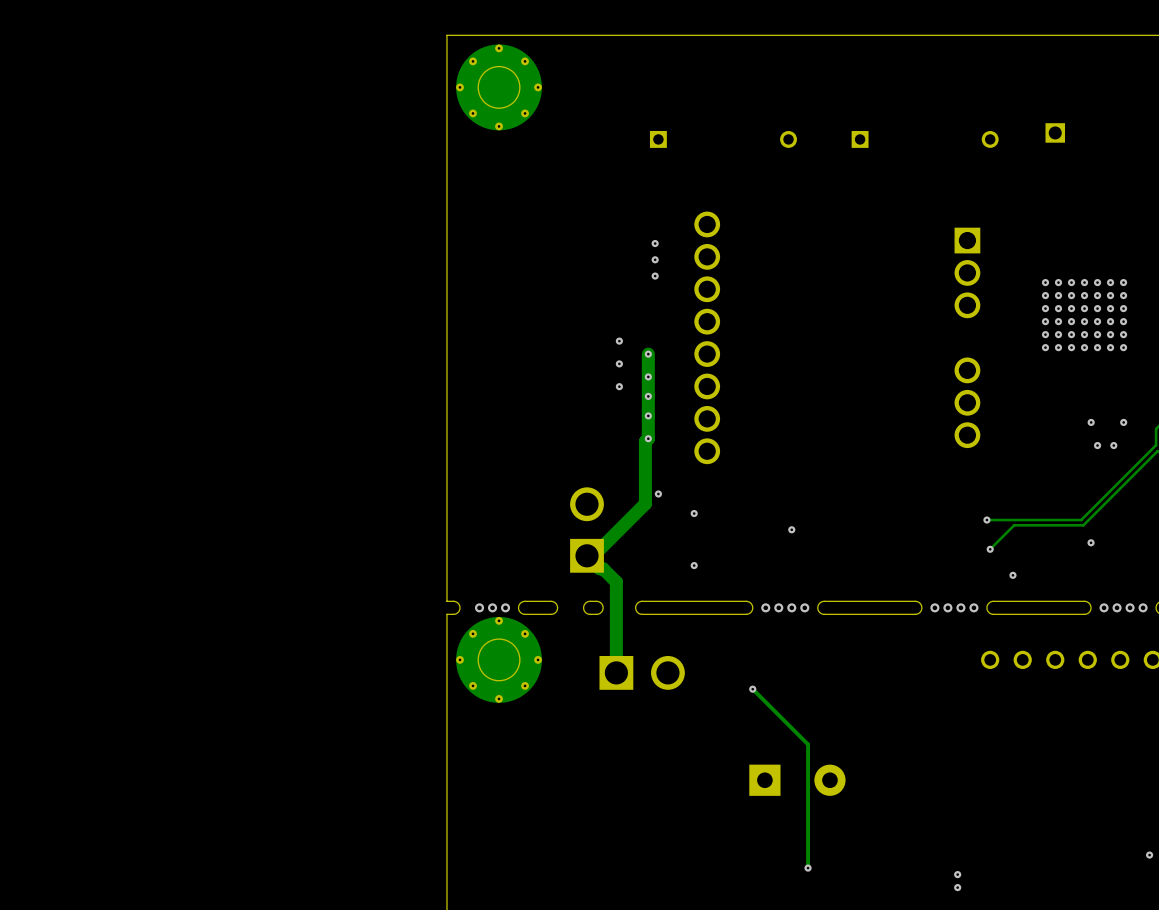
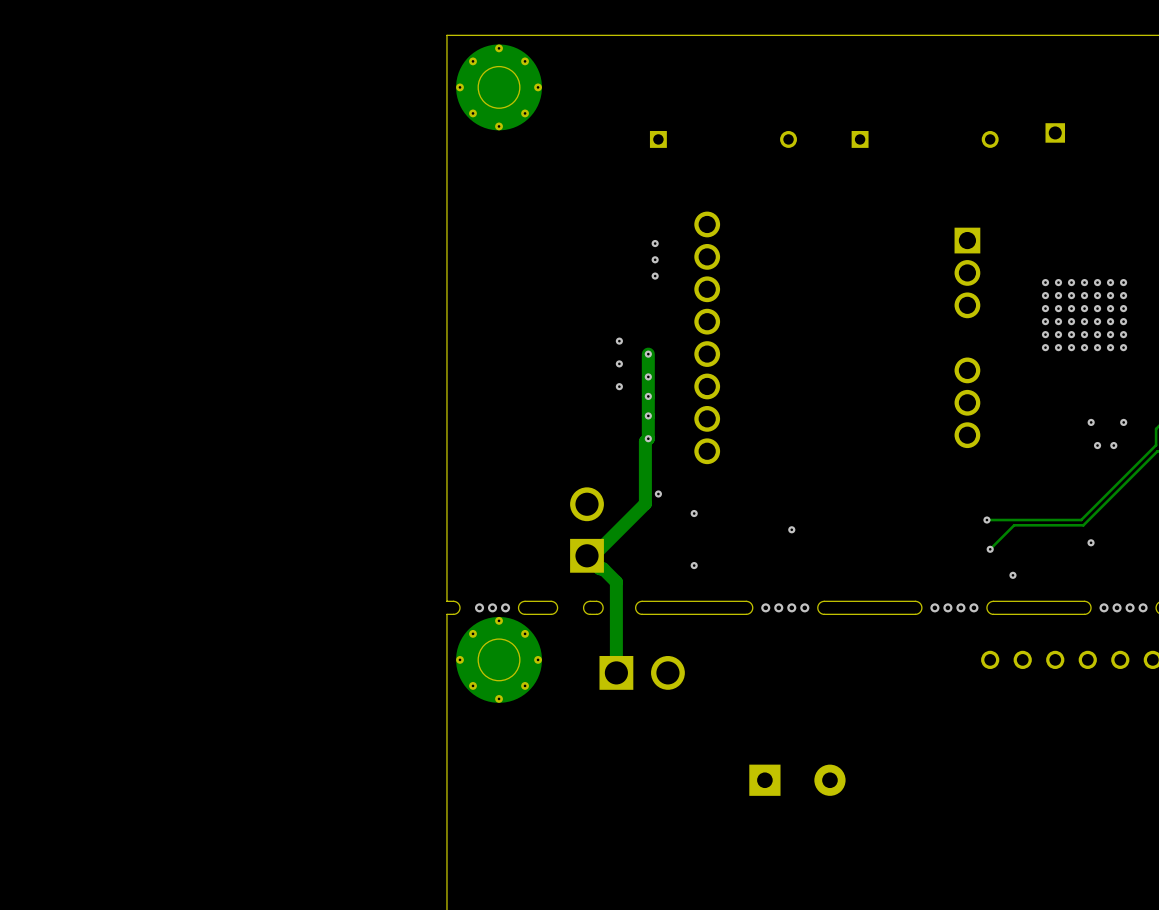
track: (752, 689) (808, 744) (808, 868) -> none
via: (752, 689) -> none
via: (1149, 855) -> none
via: (808, 868) -> none
via: (957, 874) -> none
via: (957, 887) -> none

